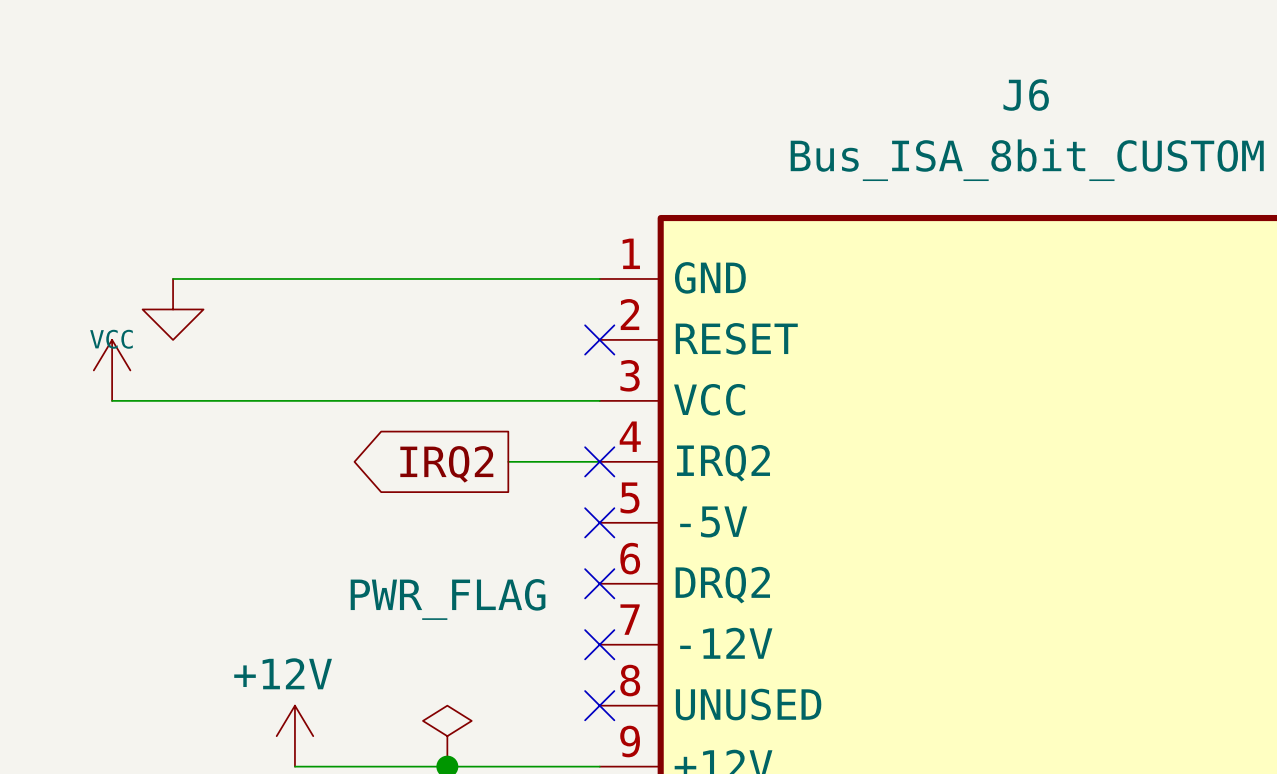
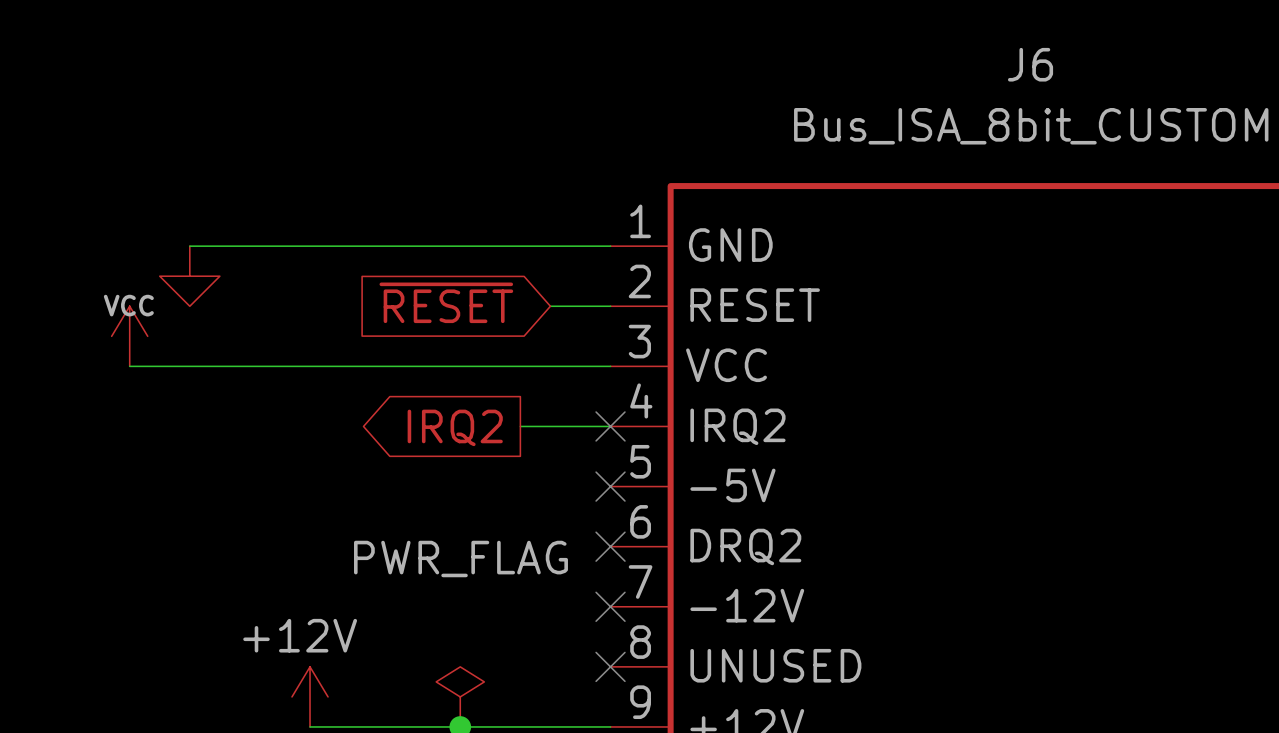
global label: none -> ~{RESET} (446, 302)
wire: none -> (550, 306) (610, 306)
no-connect mark: (599, 339) -> none

